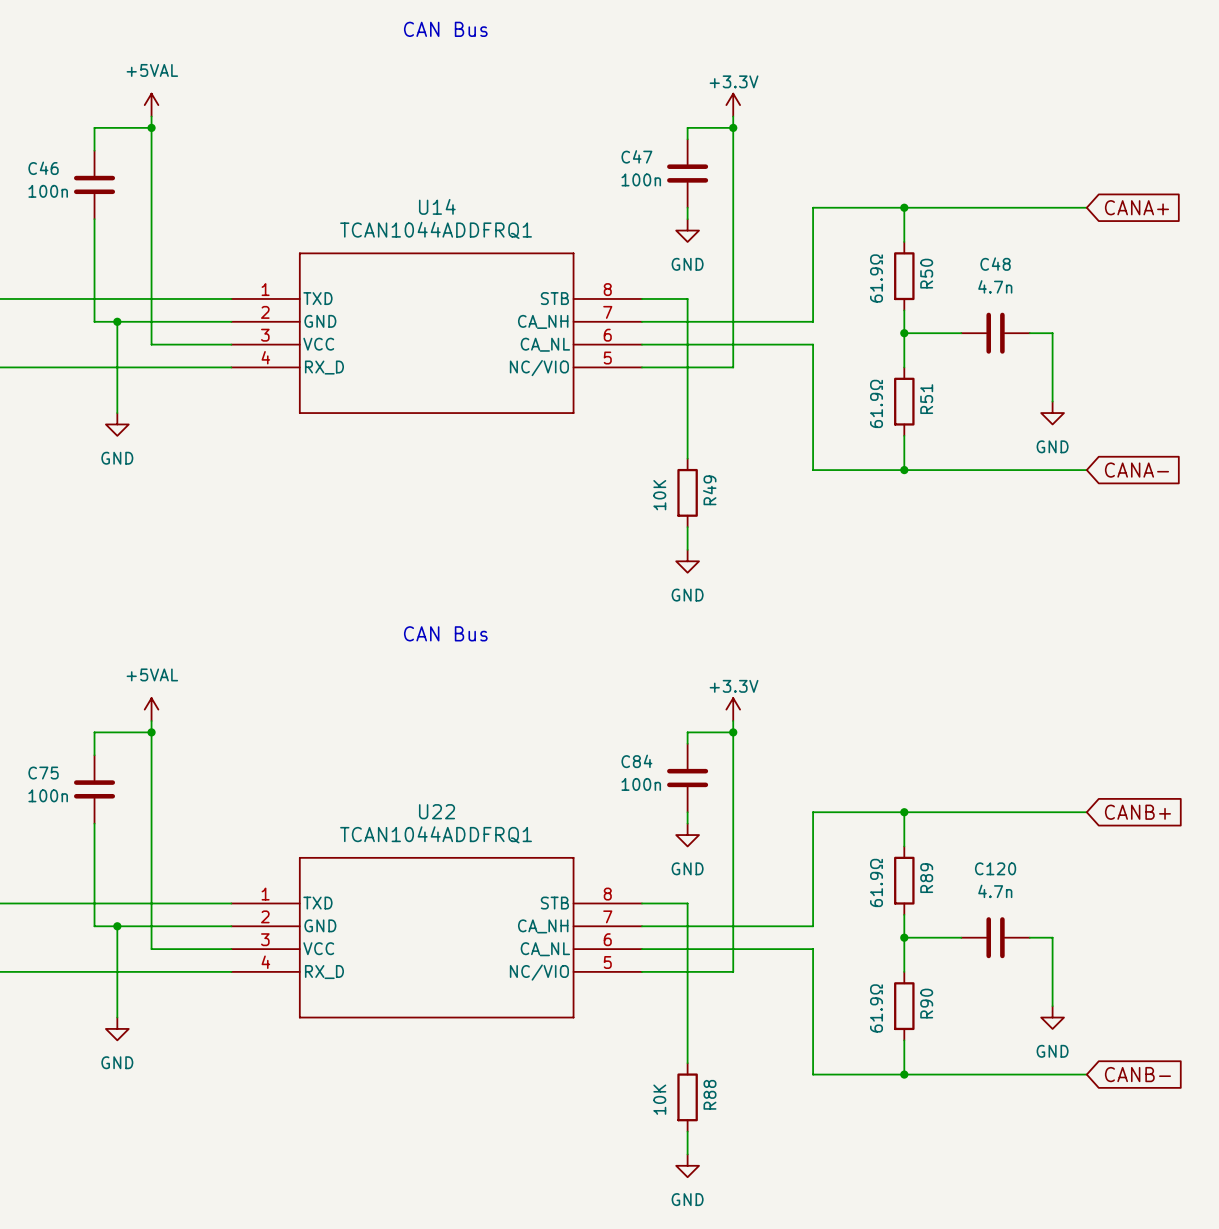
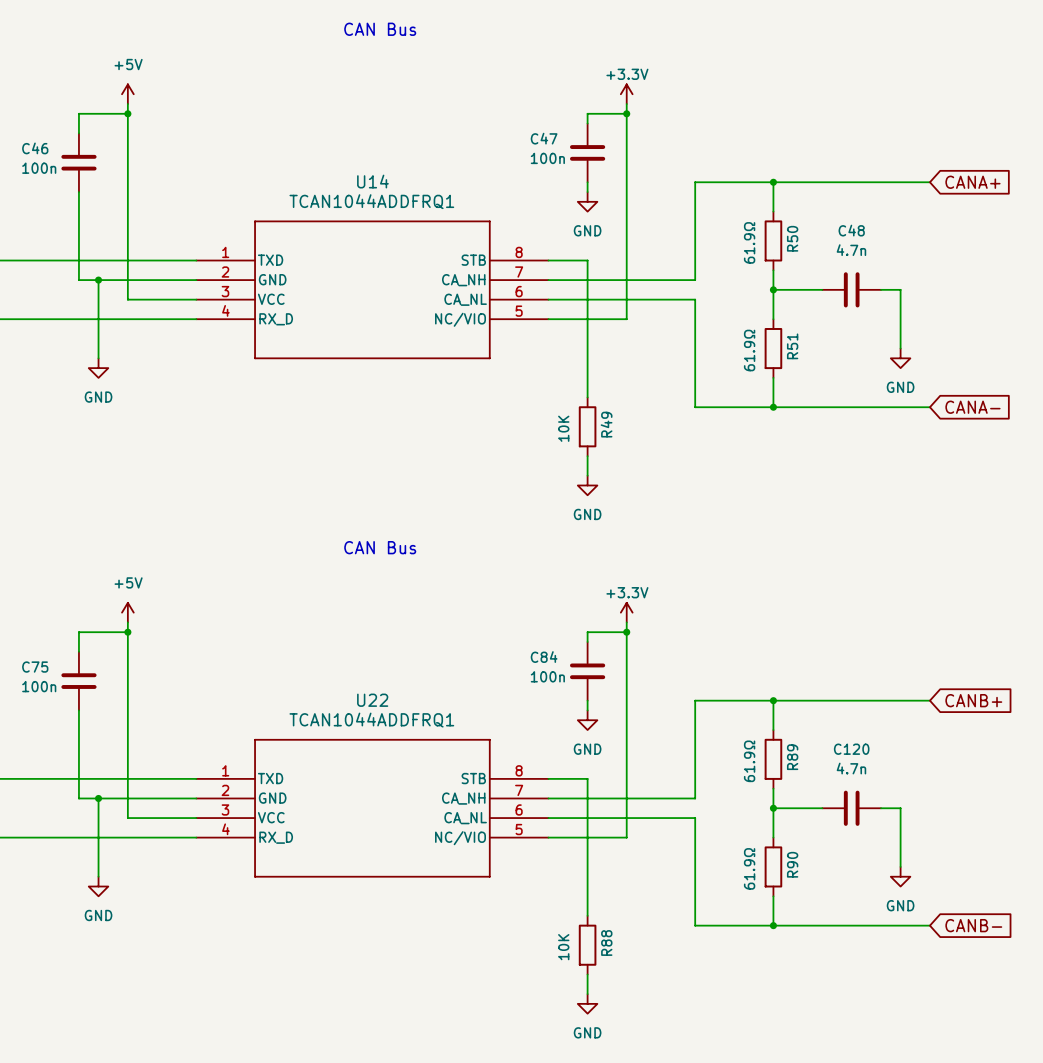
power symbol: +5VAL (151, 105) -> +5V (127, 94)
power symbol: +5VAL (151, 709) -> +5V (127, 612)

